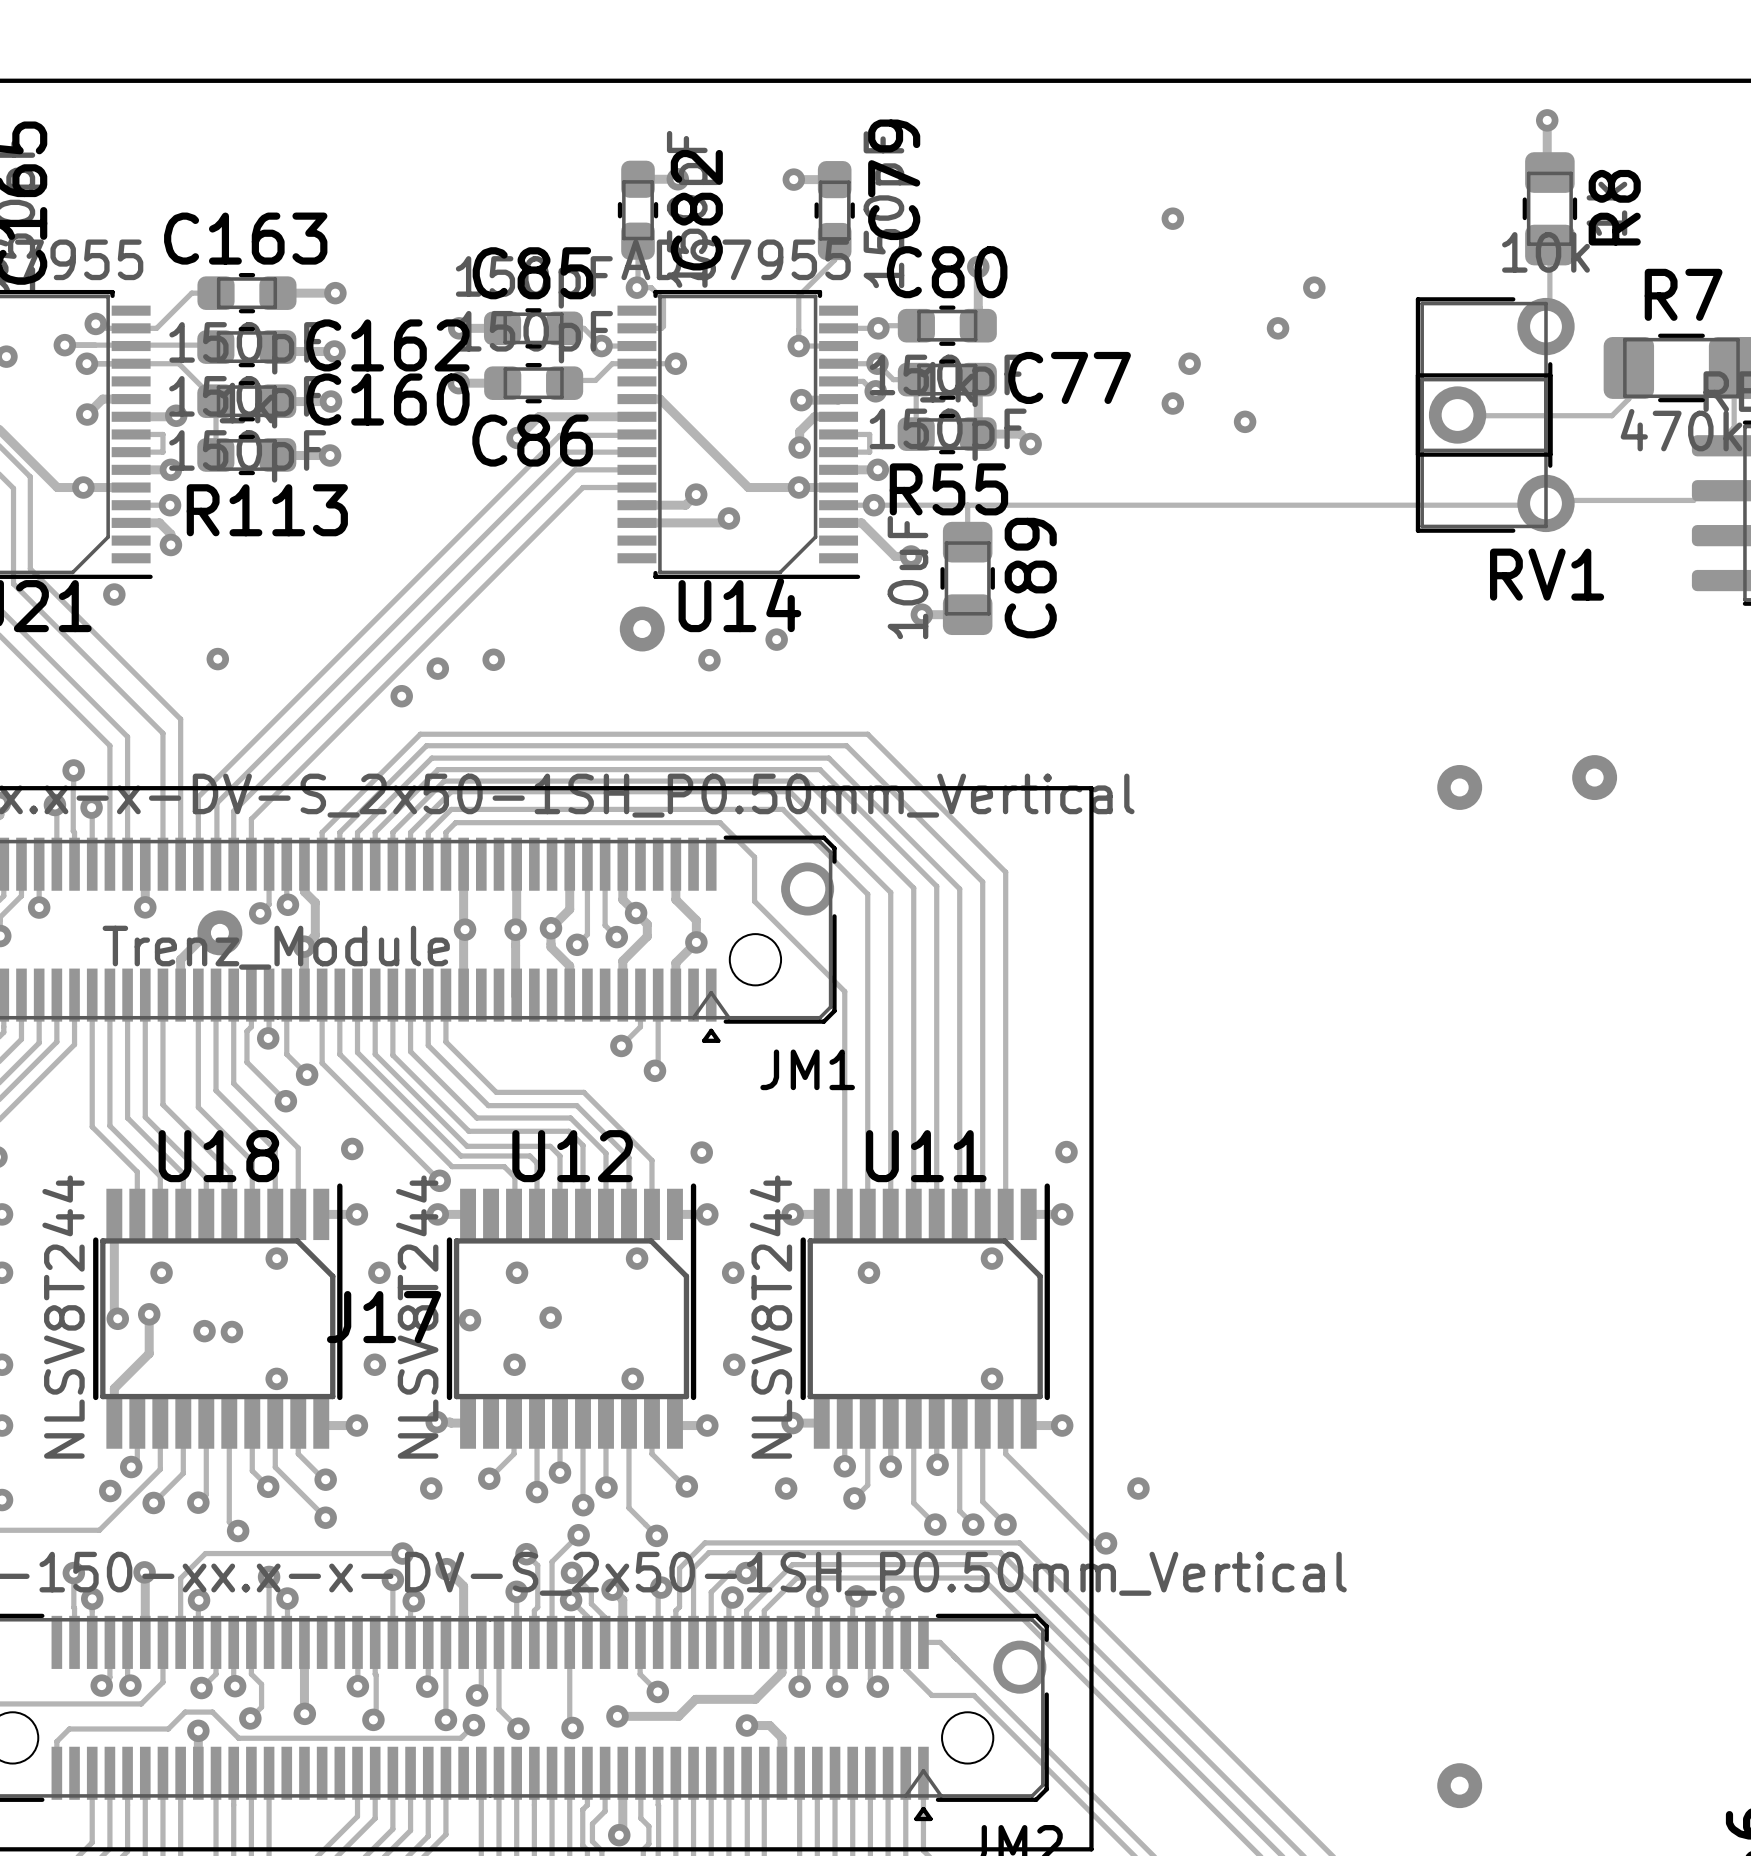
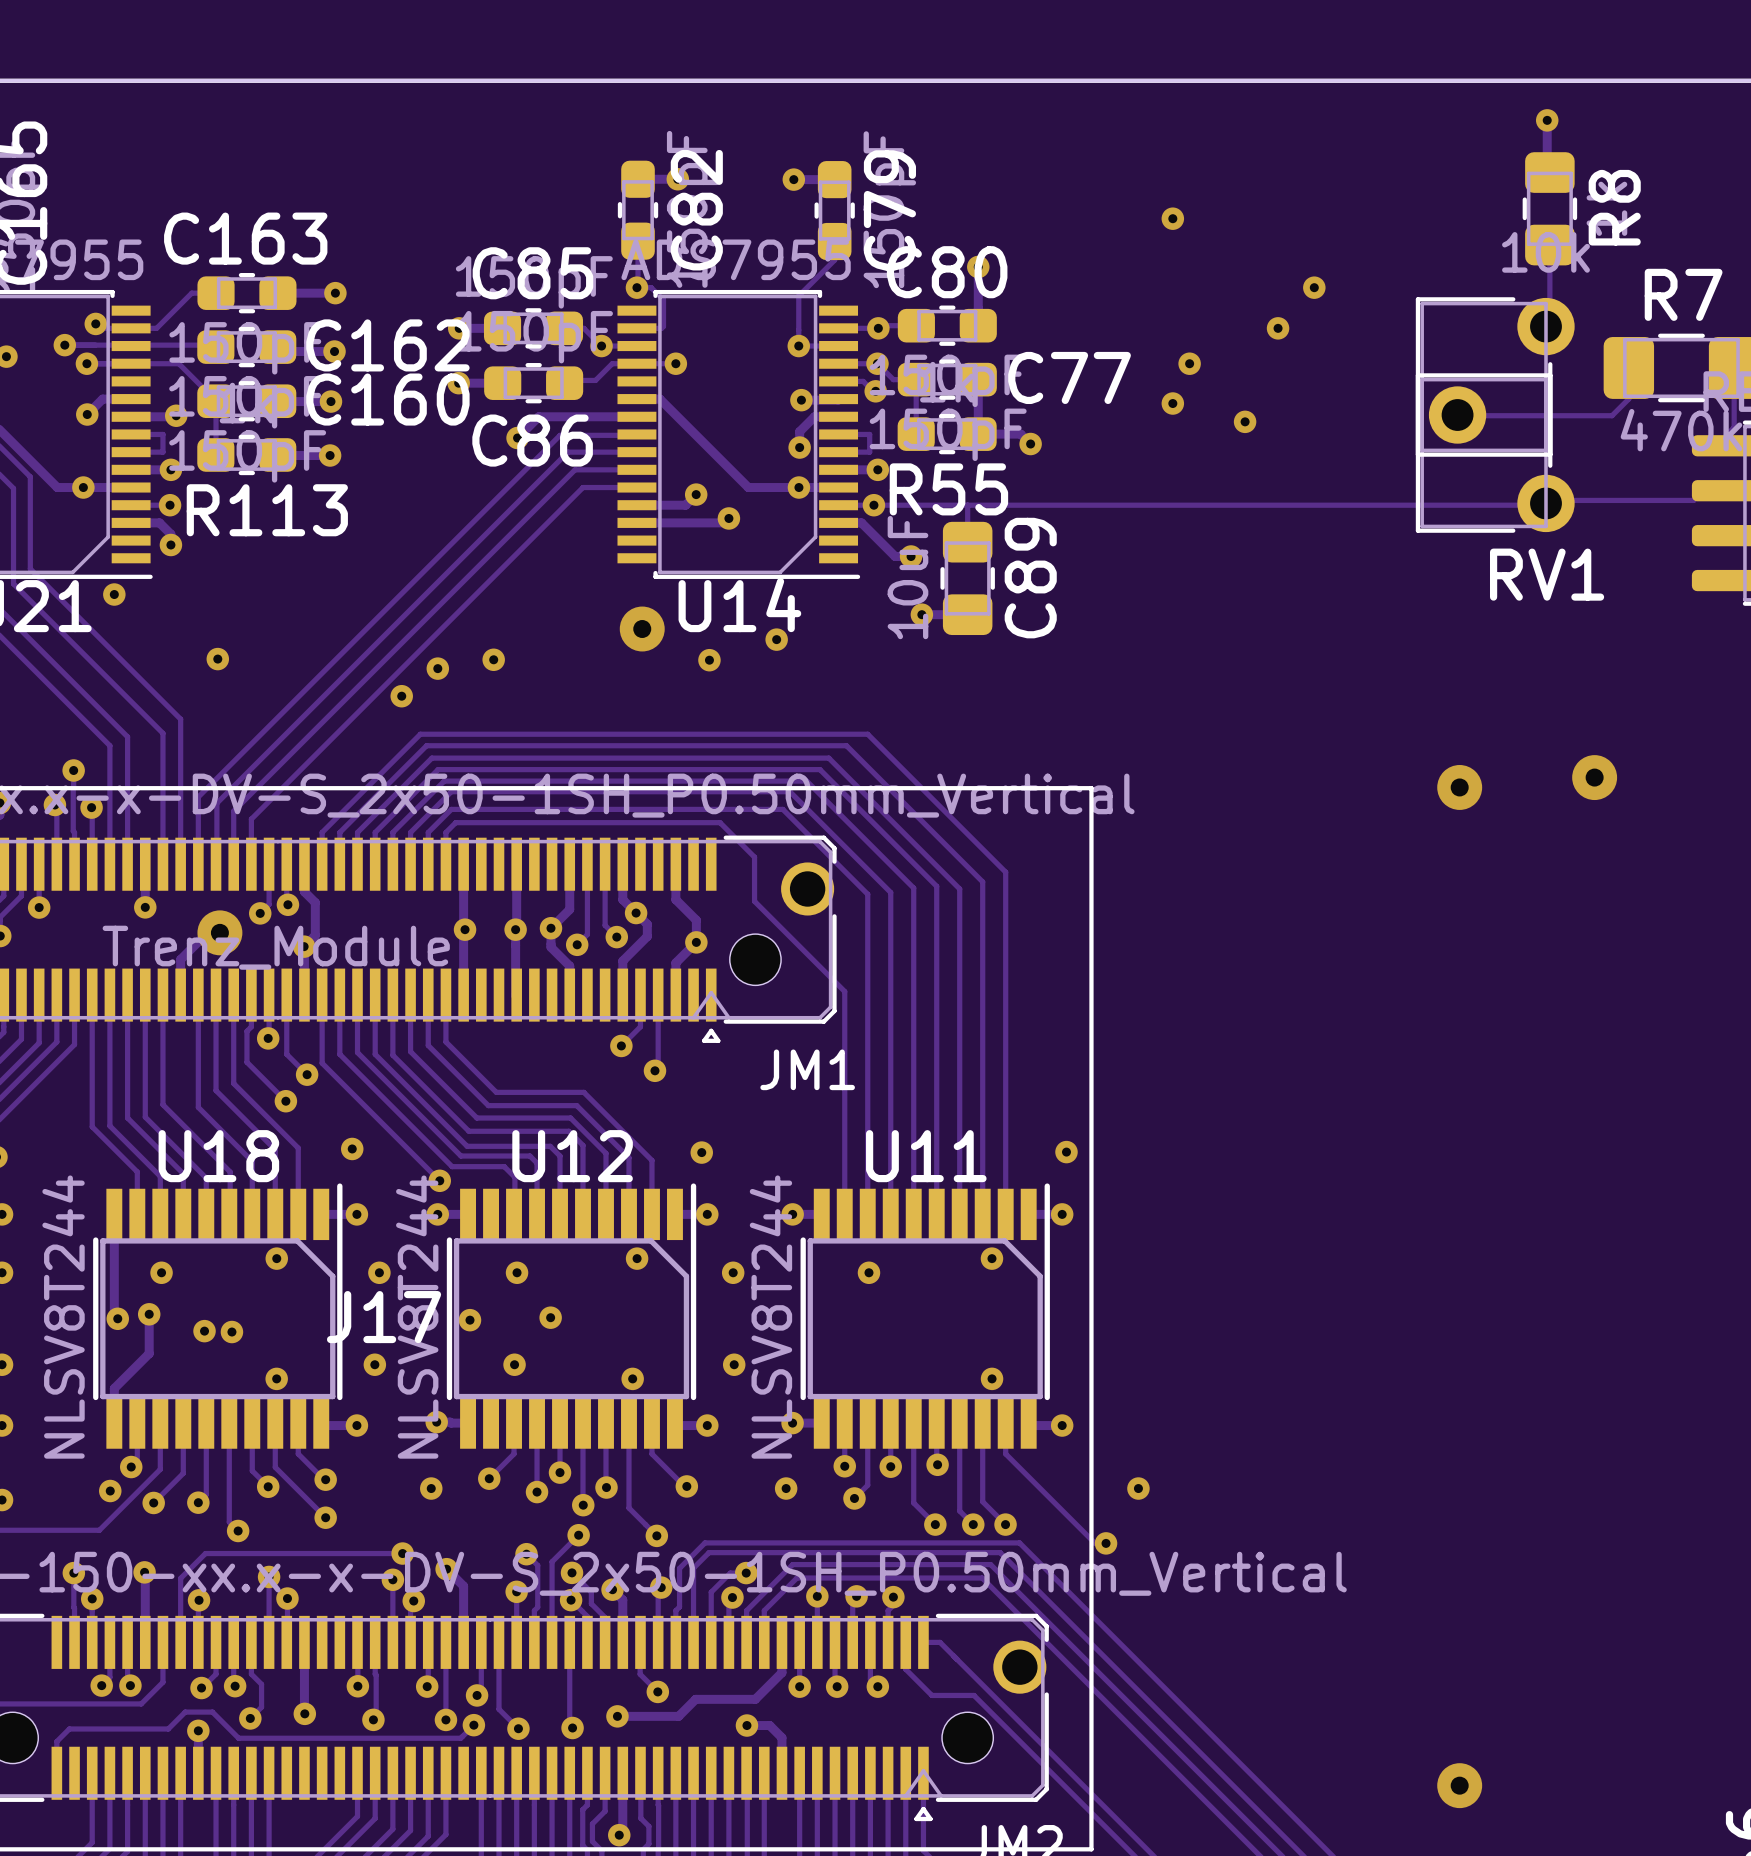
C79 name position: C79 (894, 179) -> C79 (889, 210)

